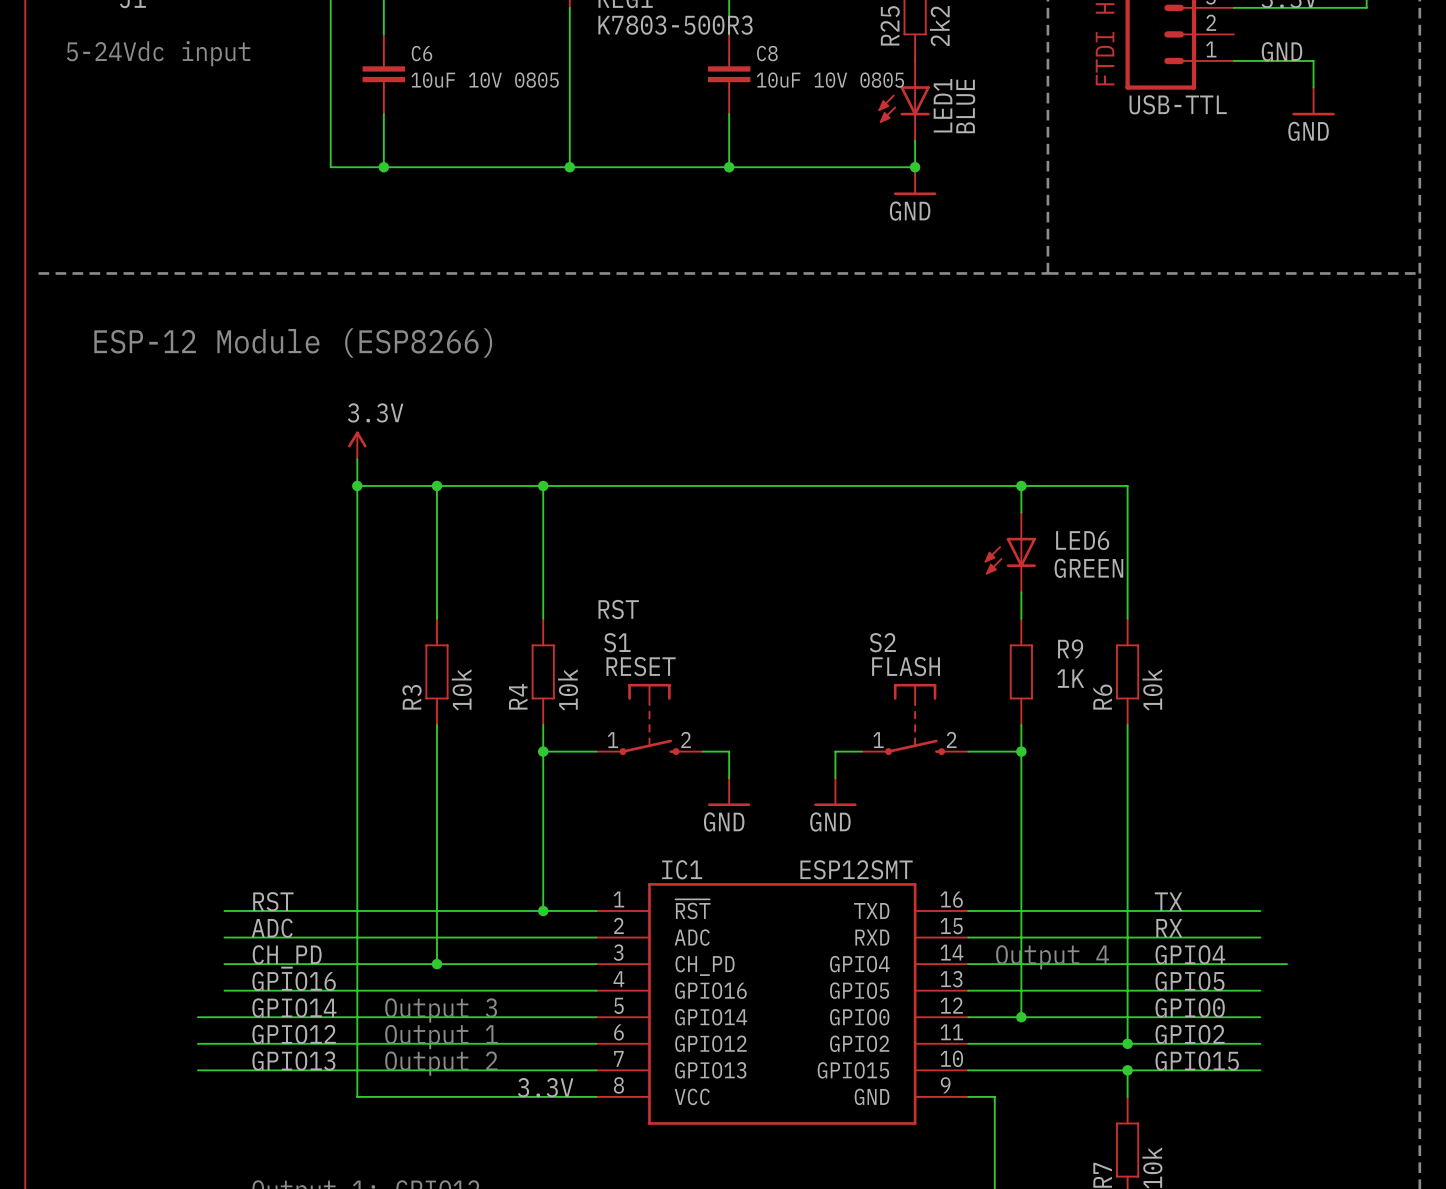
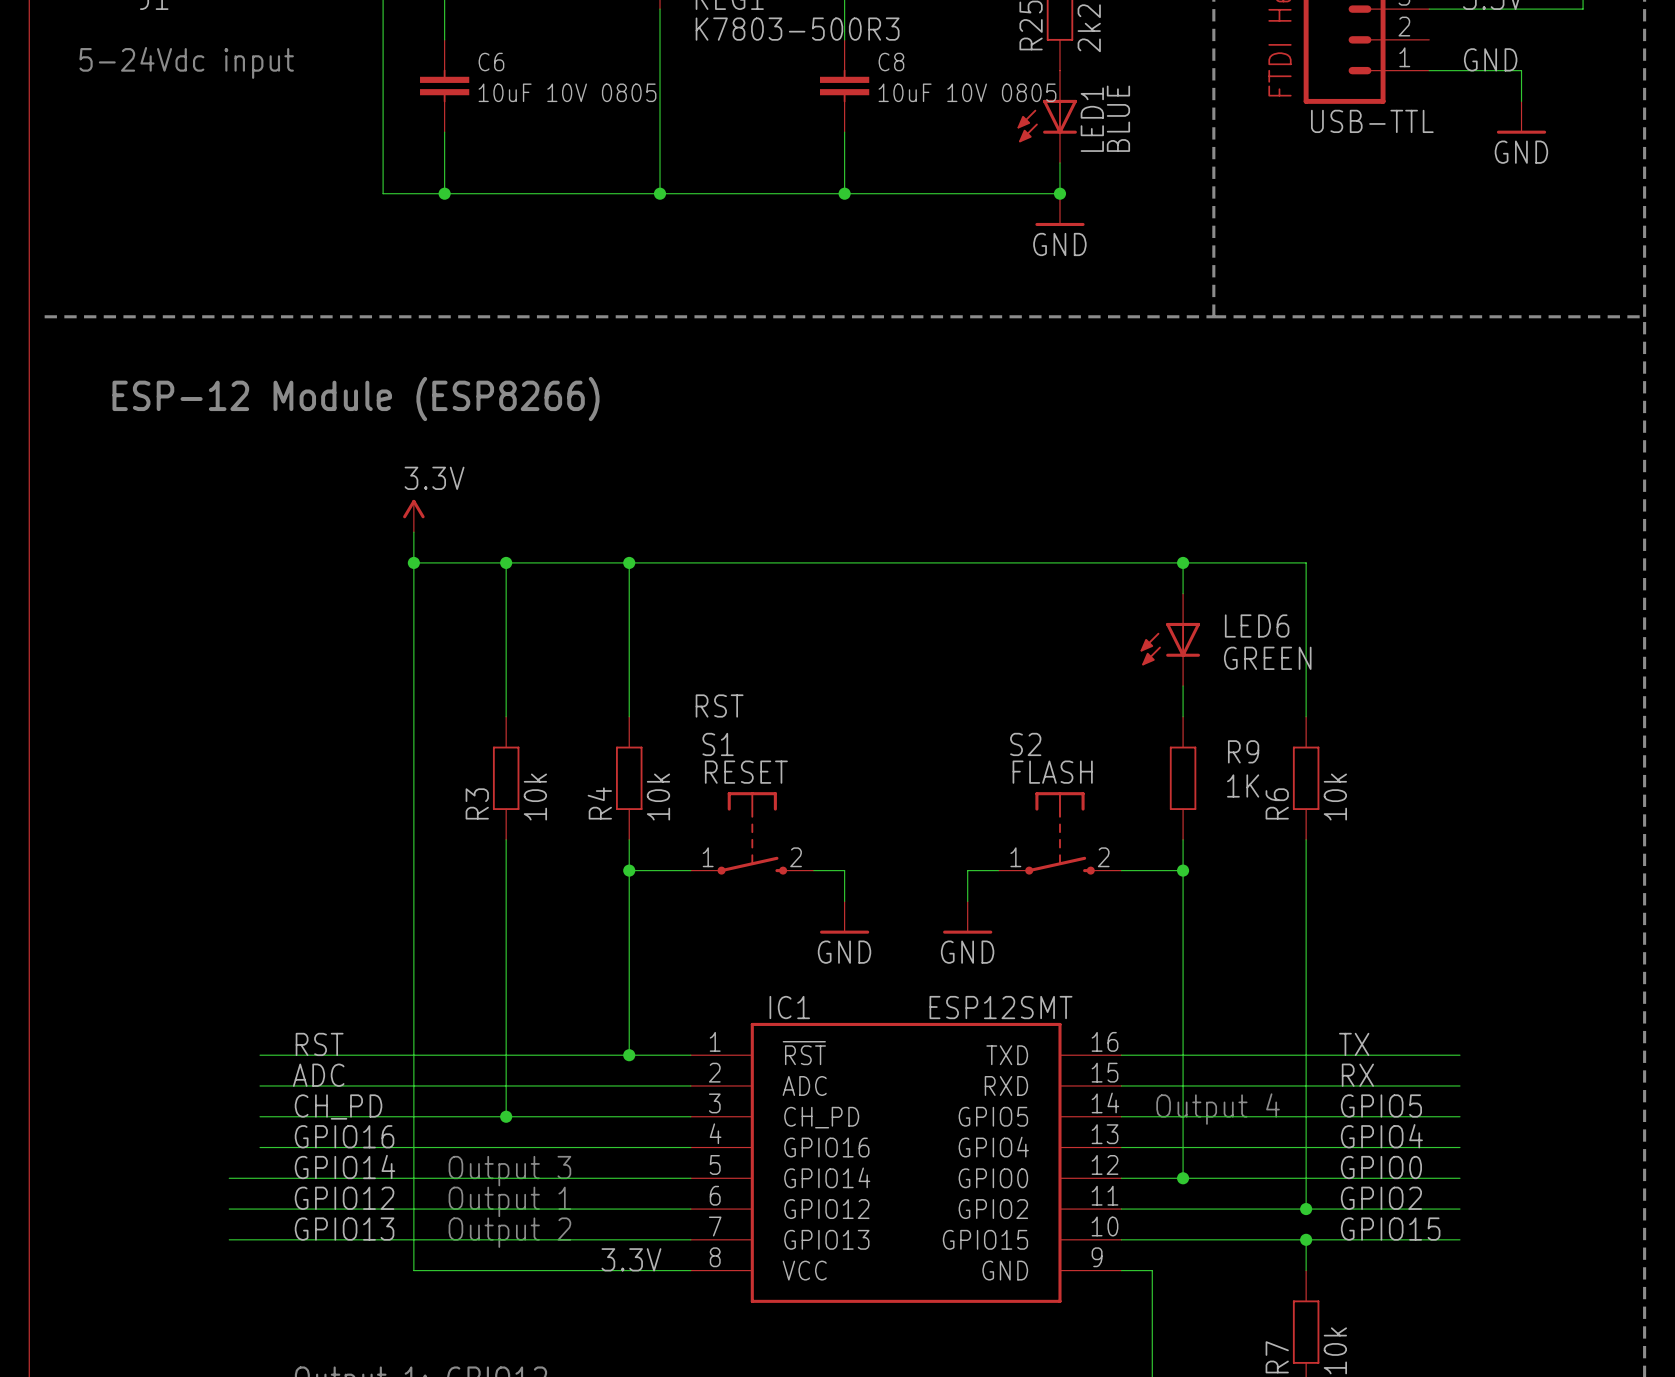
label: GPIO4 (1190, 954) -> GPIO5 (1381, 1105)
IC1 pin name: GPIO4 (859, 964) -> GPIO5 (993, 1116)
wire: (1260, 964) (1286, 964) -> none
label: GPIO5 (1190, 981) -> GPIO4 (1381, 1136)
IC1 pin name: GPIO5 (859, 990) -> GPIO4 (993, 1147)

